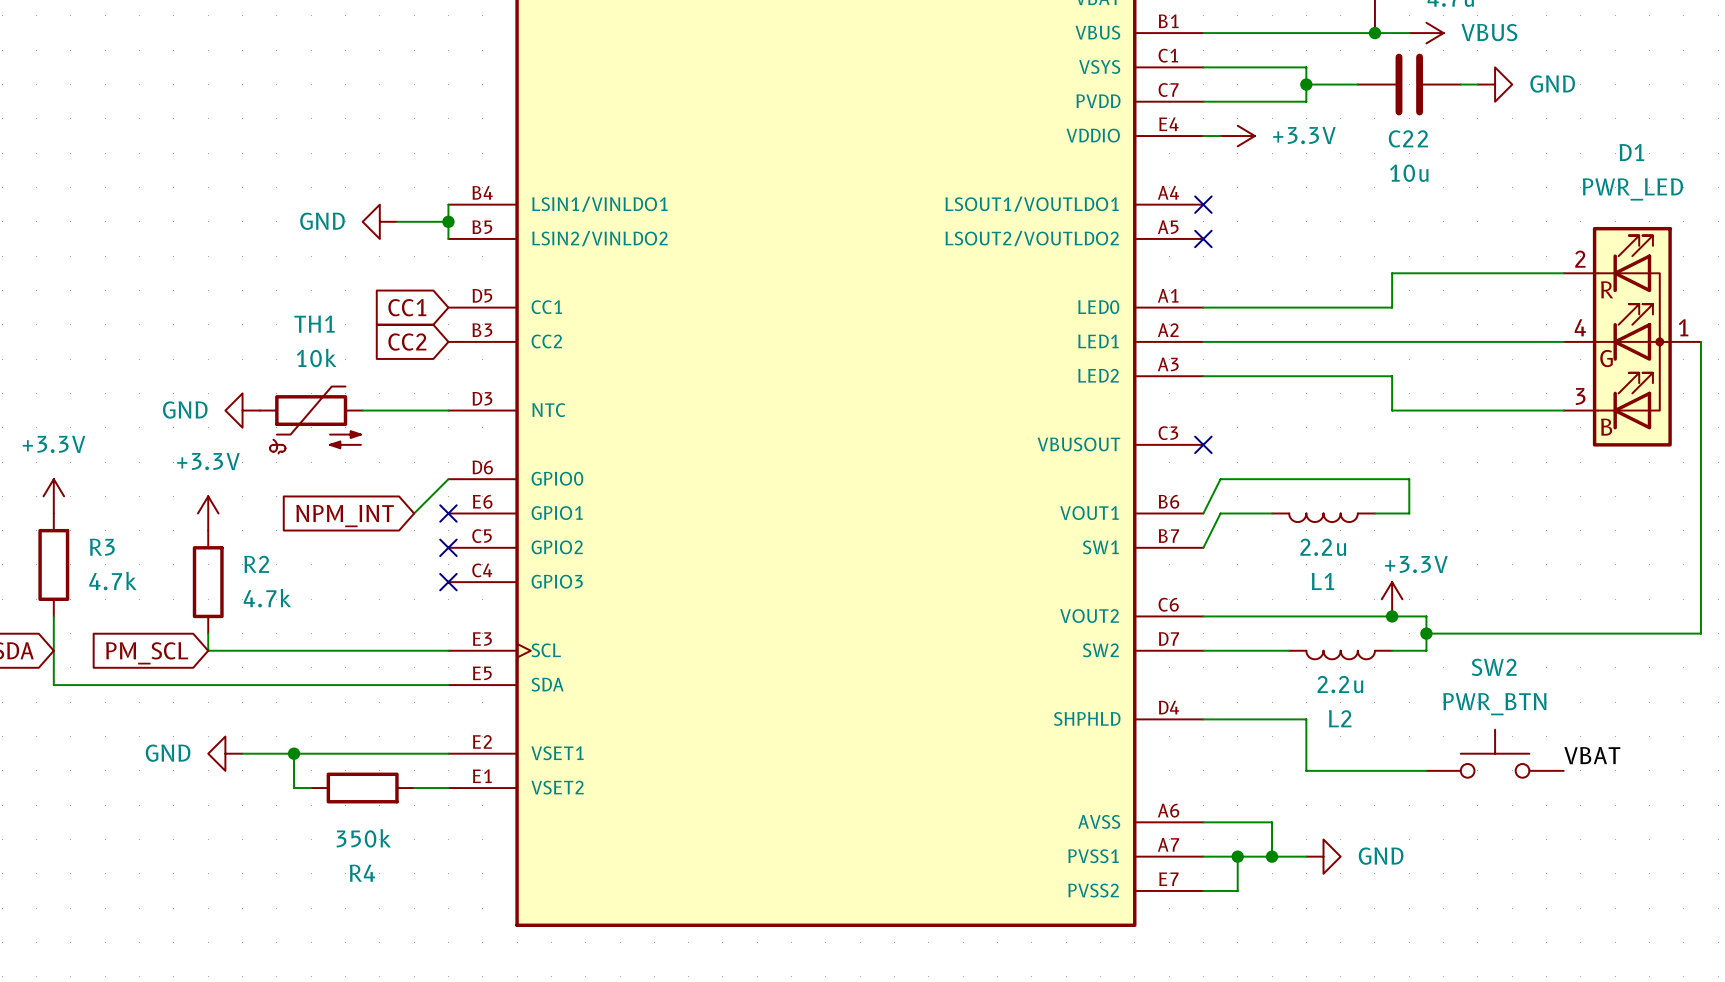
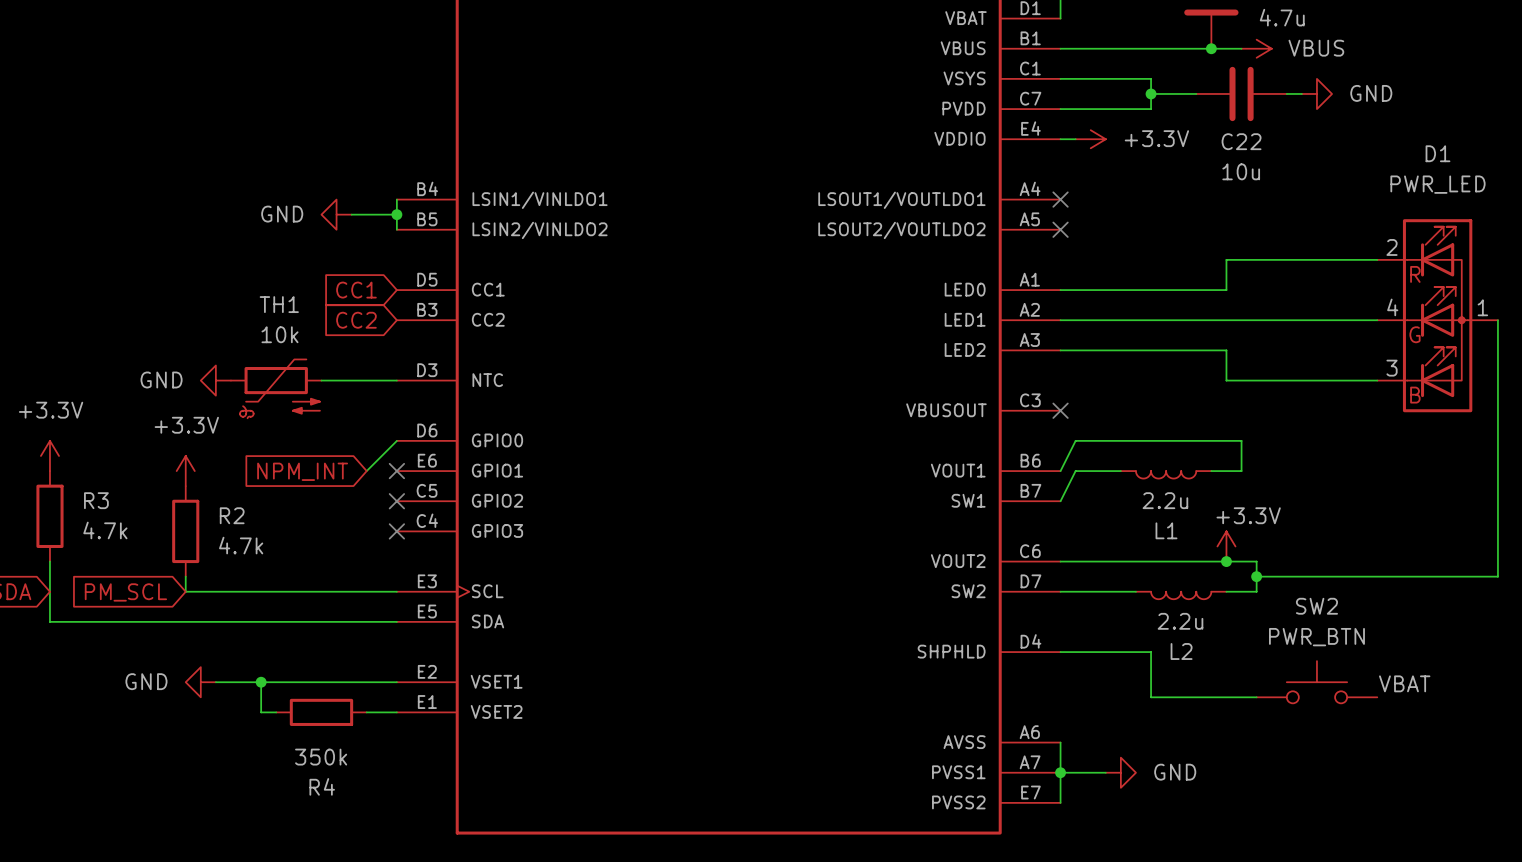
wire: (1203, 822) (1272, 822) (1272, 856) -> none
junction: none -> (1060, 772)
wire: (1237, 856) (1237, 890) (1203, 890) -> (1060, 742) (1060, 802)
junction: (1237, 856) -> none
wire: (1254, 856) (1306, 856) -> none
junction: (1272, 856) -> none
power symbol position: GND (1323, 856) -> GND (1120, 772)

